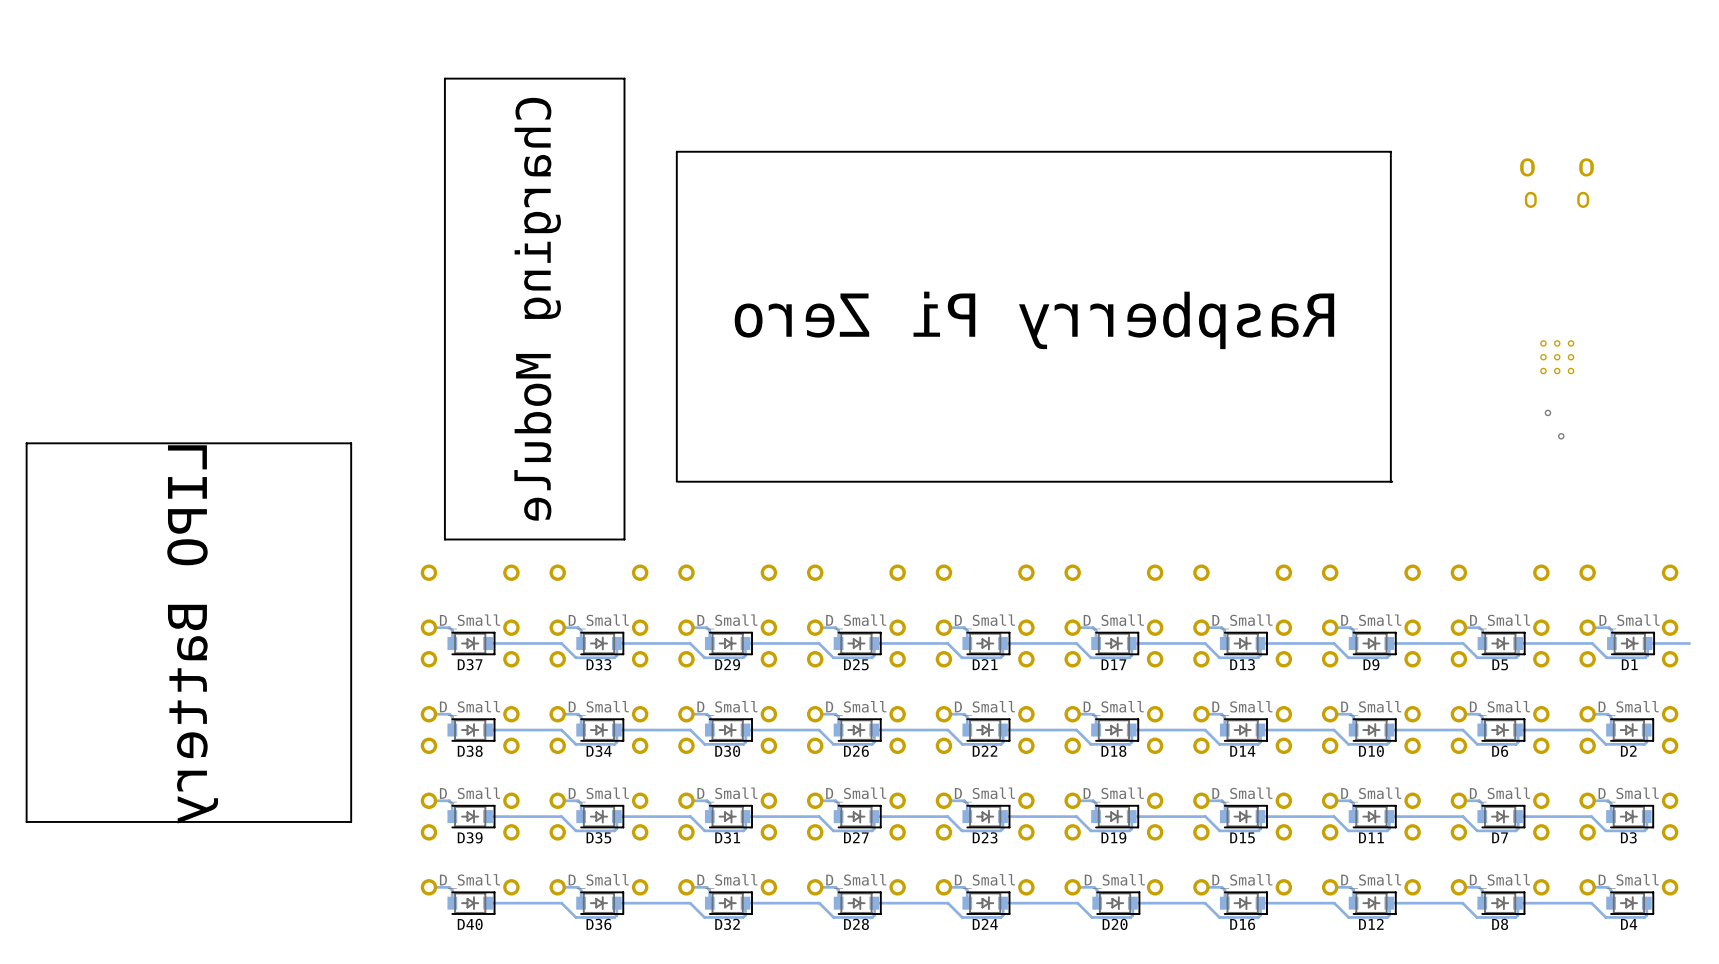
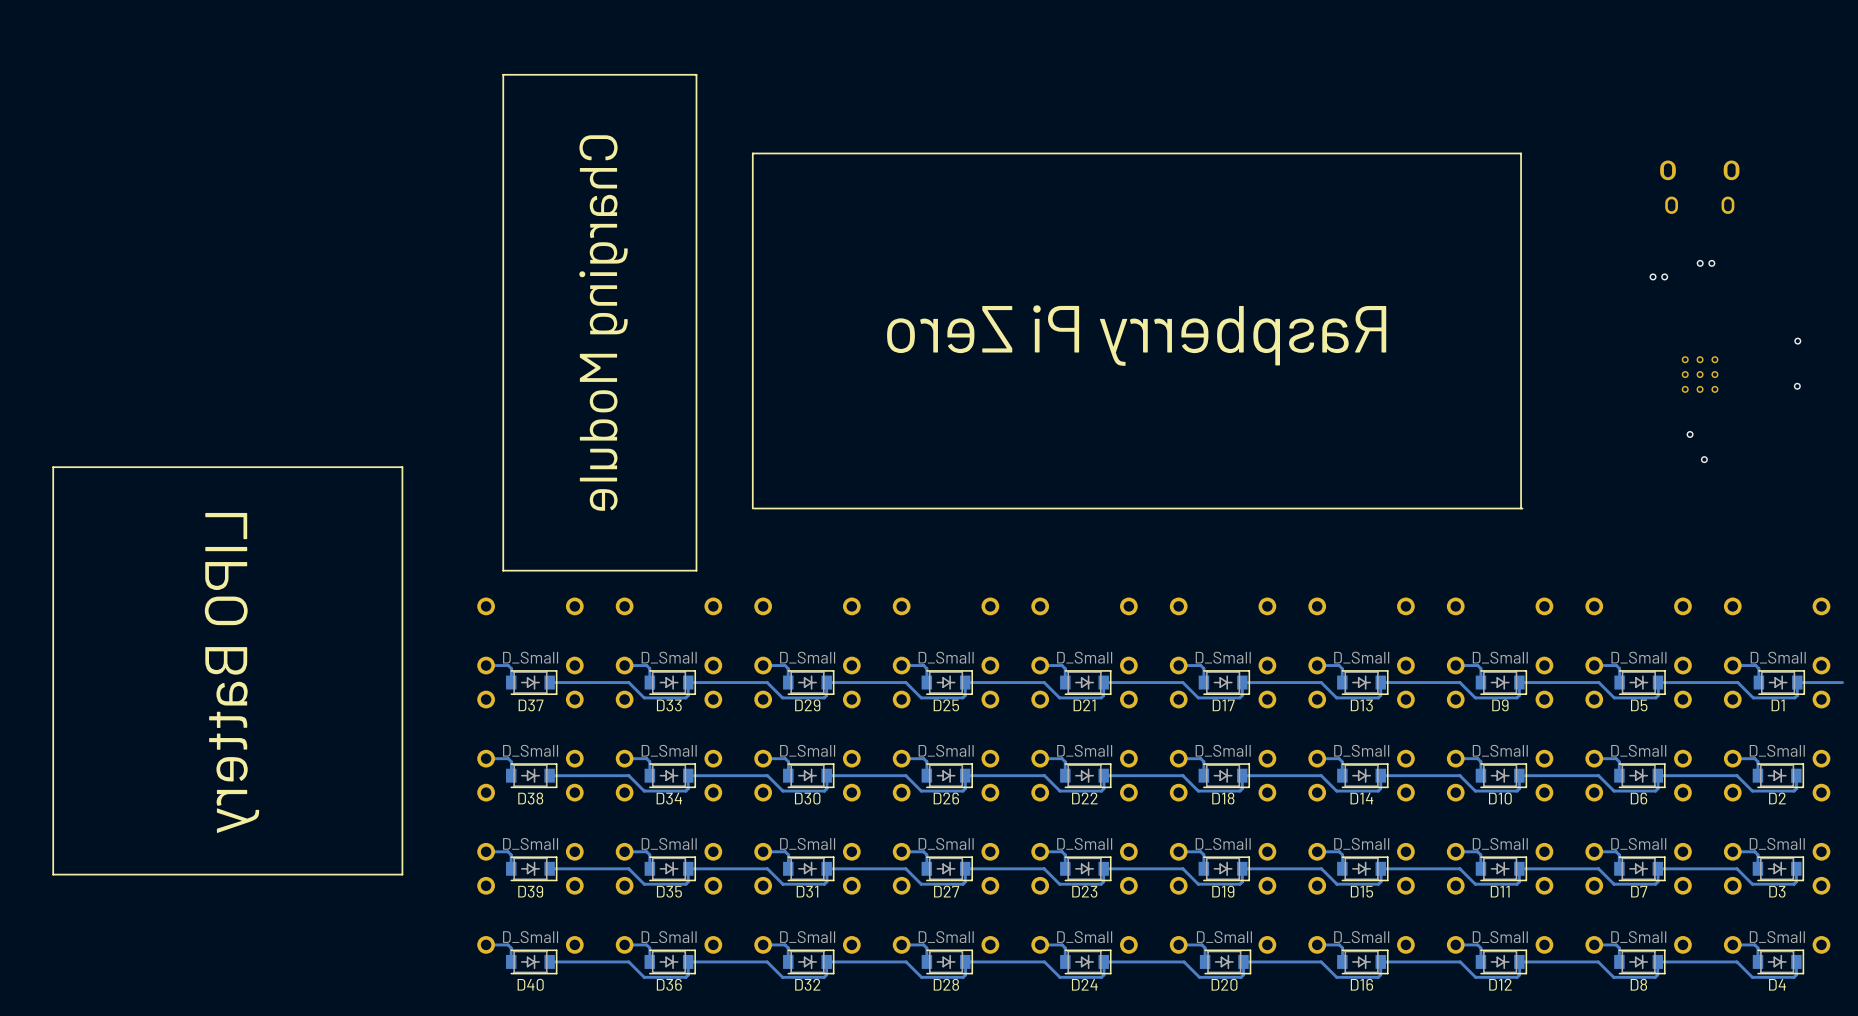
via: none -> (1700, 263)
via: none -> (1711, 263)
via: none -> (1653, 276)
via: none -> (1664, 276)
via: none -> (1797, 341)
via: none -> (1797, 386)

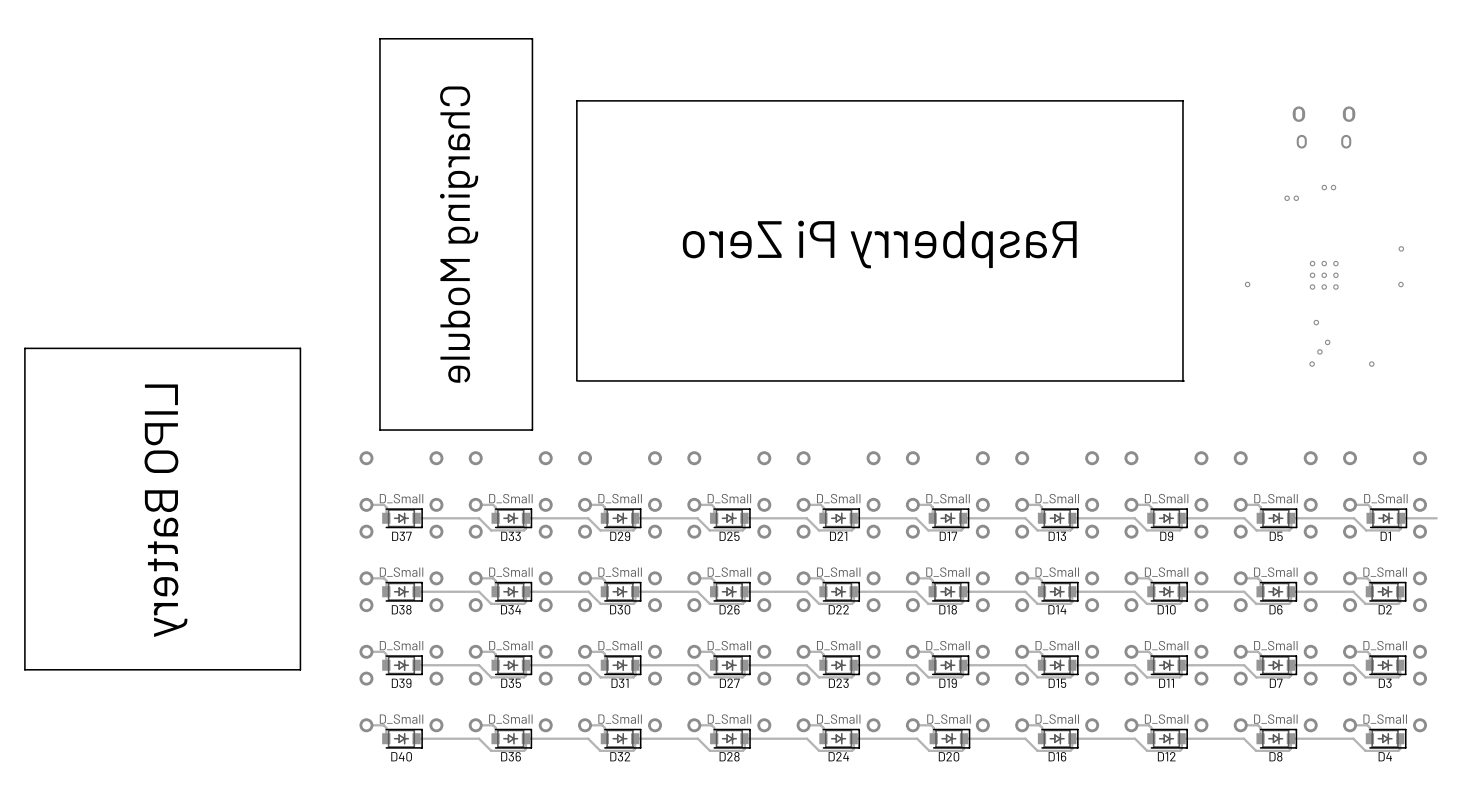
via: none -> (1247, 284)
via: none -> (1319, 351)
via: none -> (1312, 364)
via: none -> (1371, 364)

